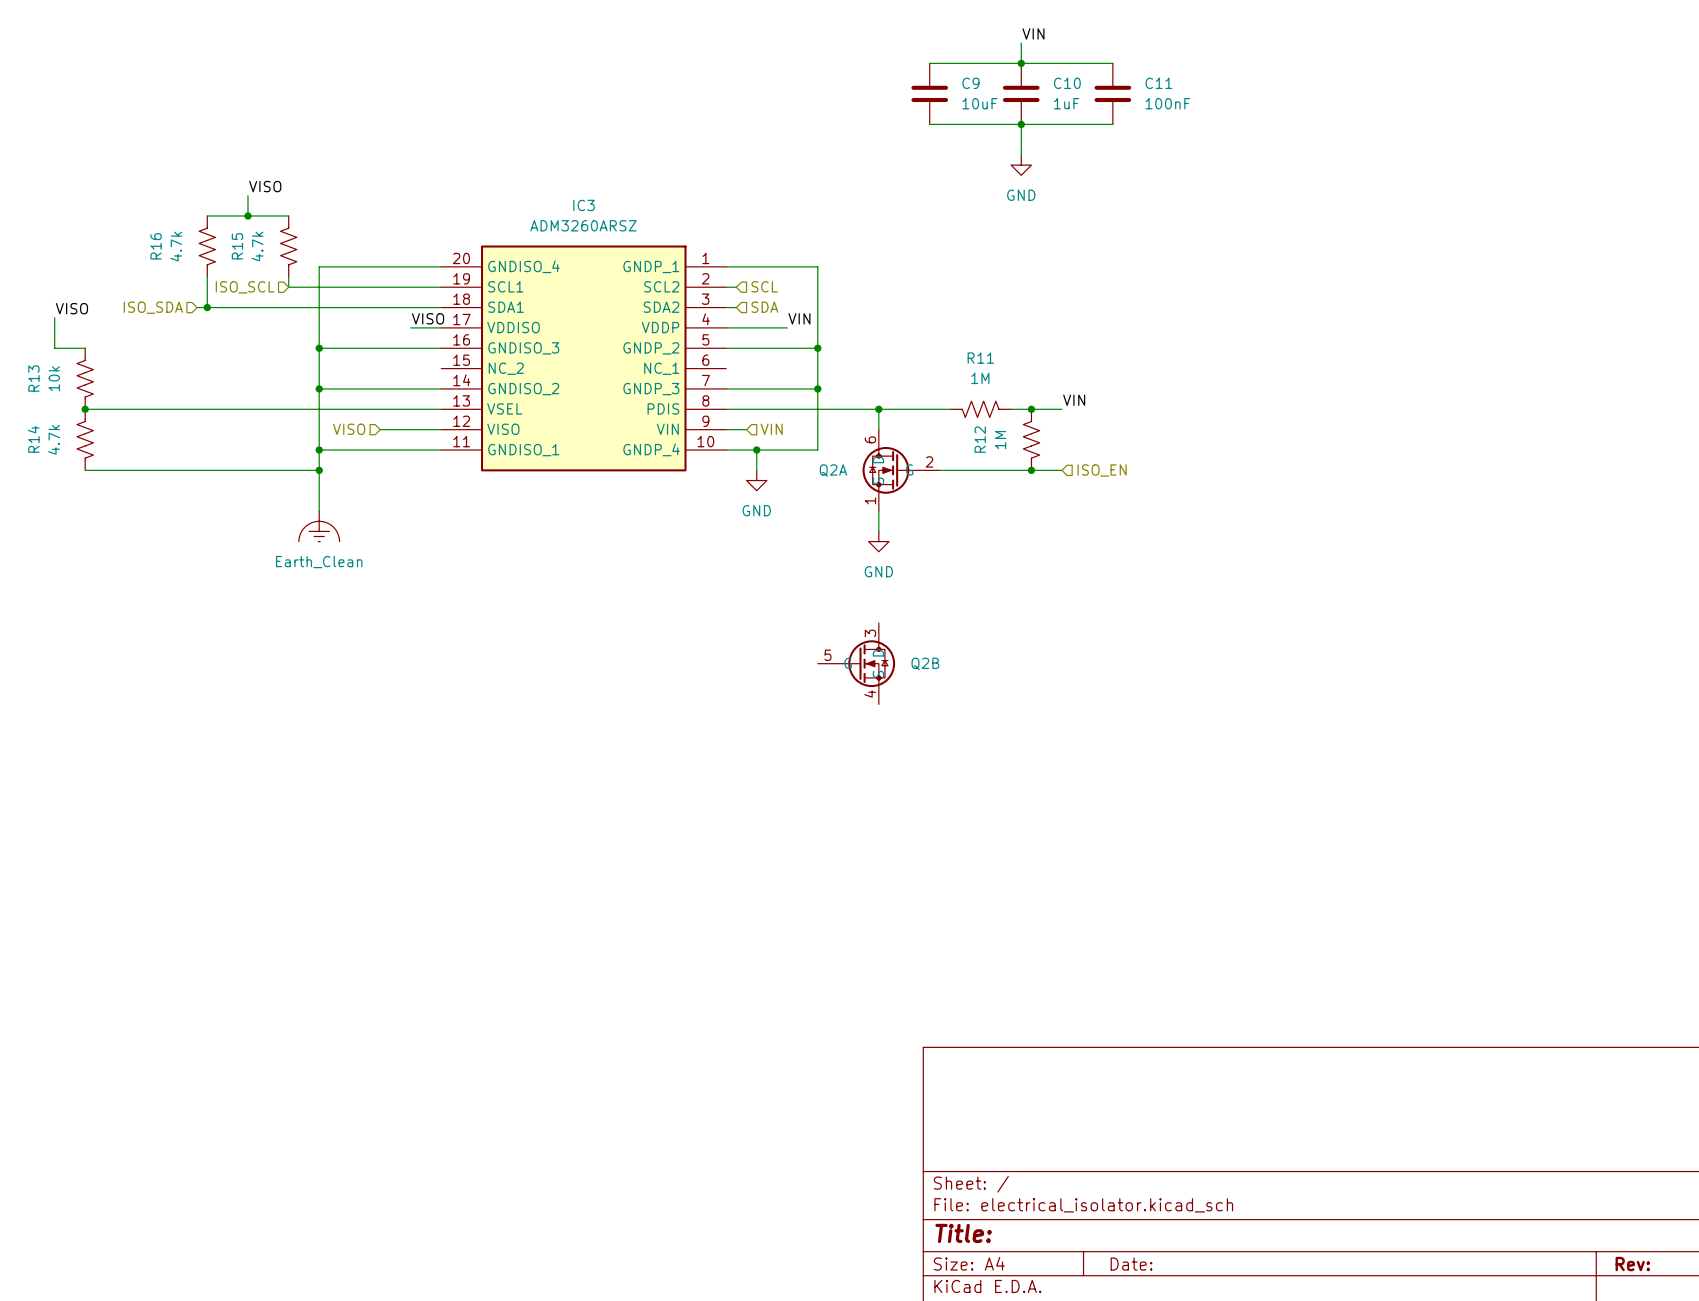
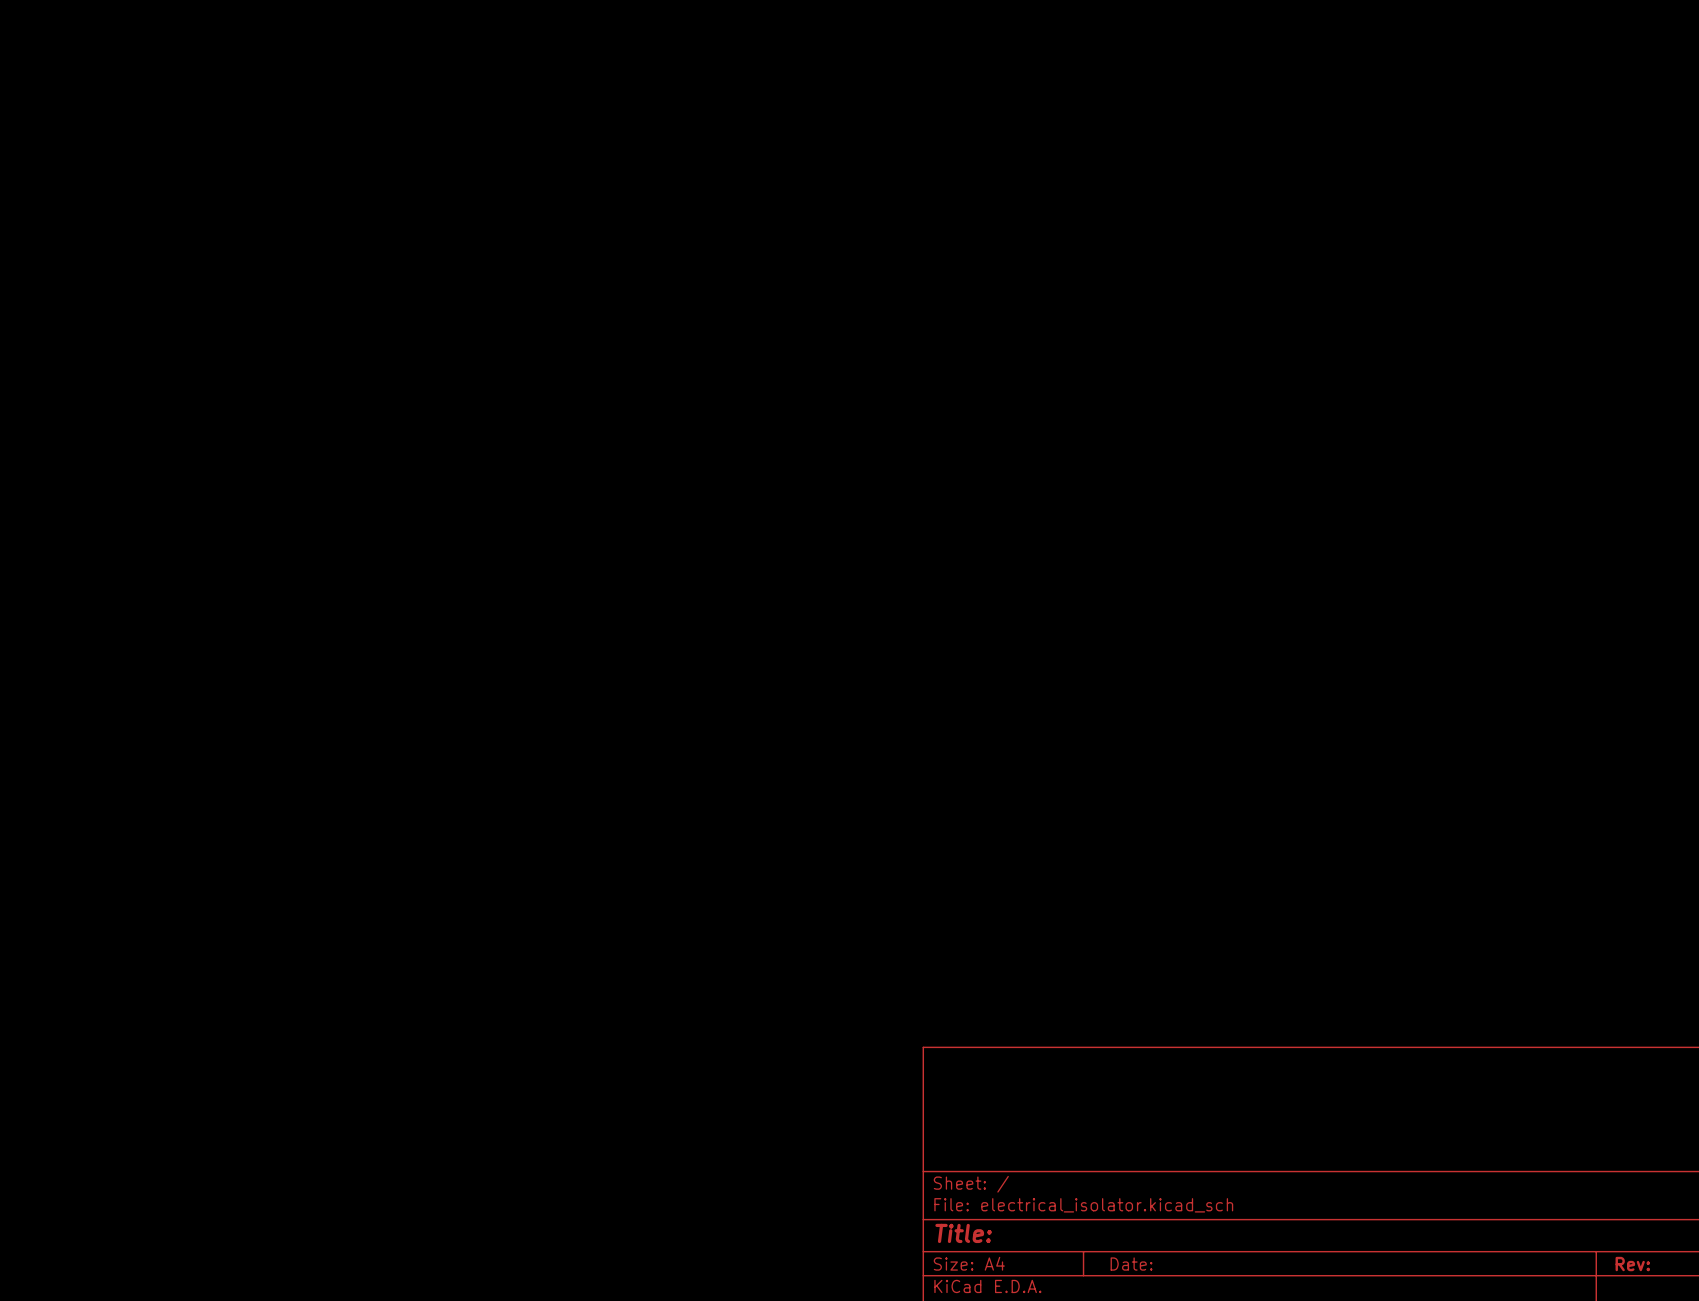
label: VIN (1033, 33) -> none
wire: (1021, 43) (1021, 63) -> none
wire: (929, 63) (1112, 63) -> none
junction: (1021, 63) -> none
C9: 10uF (929, 93) -> none
C10: 1uF (1021, 93) -> none
C11: 100nF (1112, 93) -> none
wire: (929, 124) (1112, 124) -> none
wire: (1021, 124) (1021, 154) -> none
junction: (1021, 124) -> none
power symbol: GND (1021, 165) -> none
label: VISO (265, 186) -> none
wire: (247, 195) (247, 215) -> none
wire: (207, 215) (288, 215) -> none
junction: (247, 215) -> none
R16: 4.7k (207, 246) -> none
R15: 4.7k (288, 246) -> none
wire: (441, 266) (319, 266) (319, 511) -> none
wire: (726, 266) (817, 266) (817, 450) (726, 450) -> none
wire: (207, 277) (207, 307) -> none
wire: (288, 277) (288, 287) (441, 287) -> none
hierarchical label: SCL (764, 286) -> none
hierarchical label: ISO_SCL (245, 287) -> none
wire: (726, 287) (736, 287) -> none
hierarchical label: ISO_SDA (153, 307) -> none
wire: (197, 307) (441, 307) -> none
junction: (207, 307) -> none
wire: (726, 307) (736, 307) -> none
hierarchical label: SDA (764, 307) -> none
label: VISO (71, 308) -> none
wire: (54, 317) (54, 348) (85, 348) -> none
label: VISO (428, 318) -> none
label: VIN (799, 318) -> none
wire: (410, 327) (441, 327) -> none
wire: (726, 327) (787, 327) -> none
wire: (319, 348) (441, 348) -> none
junction: (319, 348) -> none
wire: (726, 348) (817, 348) -> none
junction: (817, 348) -> none
IC3: ADM3260ARSZ (583, 358) -> none
R13: 10k (85, 378) -> none
wire: (319, 388) (441, 388) -> none
junction: (319, 388) -> none
wire: (726, 388) (817, 388) -> none
junction: (817, 388) -> none
label: VIN (1074, 400) -> none
wire: (85, 409) (441, 409) -> none
junction: (85, 409) -> none
wire: (726, 409) (950, 409) -> none
wire: (878, 409) (878, 429) -> none
junction: (878, 409) -> none
R11: 1M (980, 409) -> none
wire: (1011, 409) (1061, 409) -> none
junction: (1031, 409) -> none
hierarchical label: VISO (349, 429) -> none
wire: (380, 429) (441, 429) -> none
wire: (726, 429) (746, 429) -> none
hierarchical label: VIN (771, 429) -> none
R14: 4.7k (85, 439) -> none
R12: 1M (1031, 439) -> none
wire: (319, 450) (441, 450) -> none
junction: (319, 450) -> none
wire: (756, 450) (756, 470) -> none
junction: (756, 450) -> none
wire: (85, 470) (319, 470) -> none
junction: (319, 470) -> none
Q2A: (901, 470) -> none
wire: (939, 470) (1061, 470) -> none
junction: (1031, 470) -> none
hierarchical label: ISO_EN (1102, 470) -> none
power symbol: GND (756, 480) -> none
wire: (878, 511) (878, 531) -> none
power symbol: Earth_Clean (319, 526) -> none
power symbol: GND (878, 541) -> none
Q2B: (856, 663) -> none

